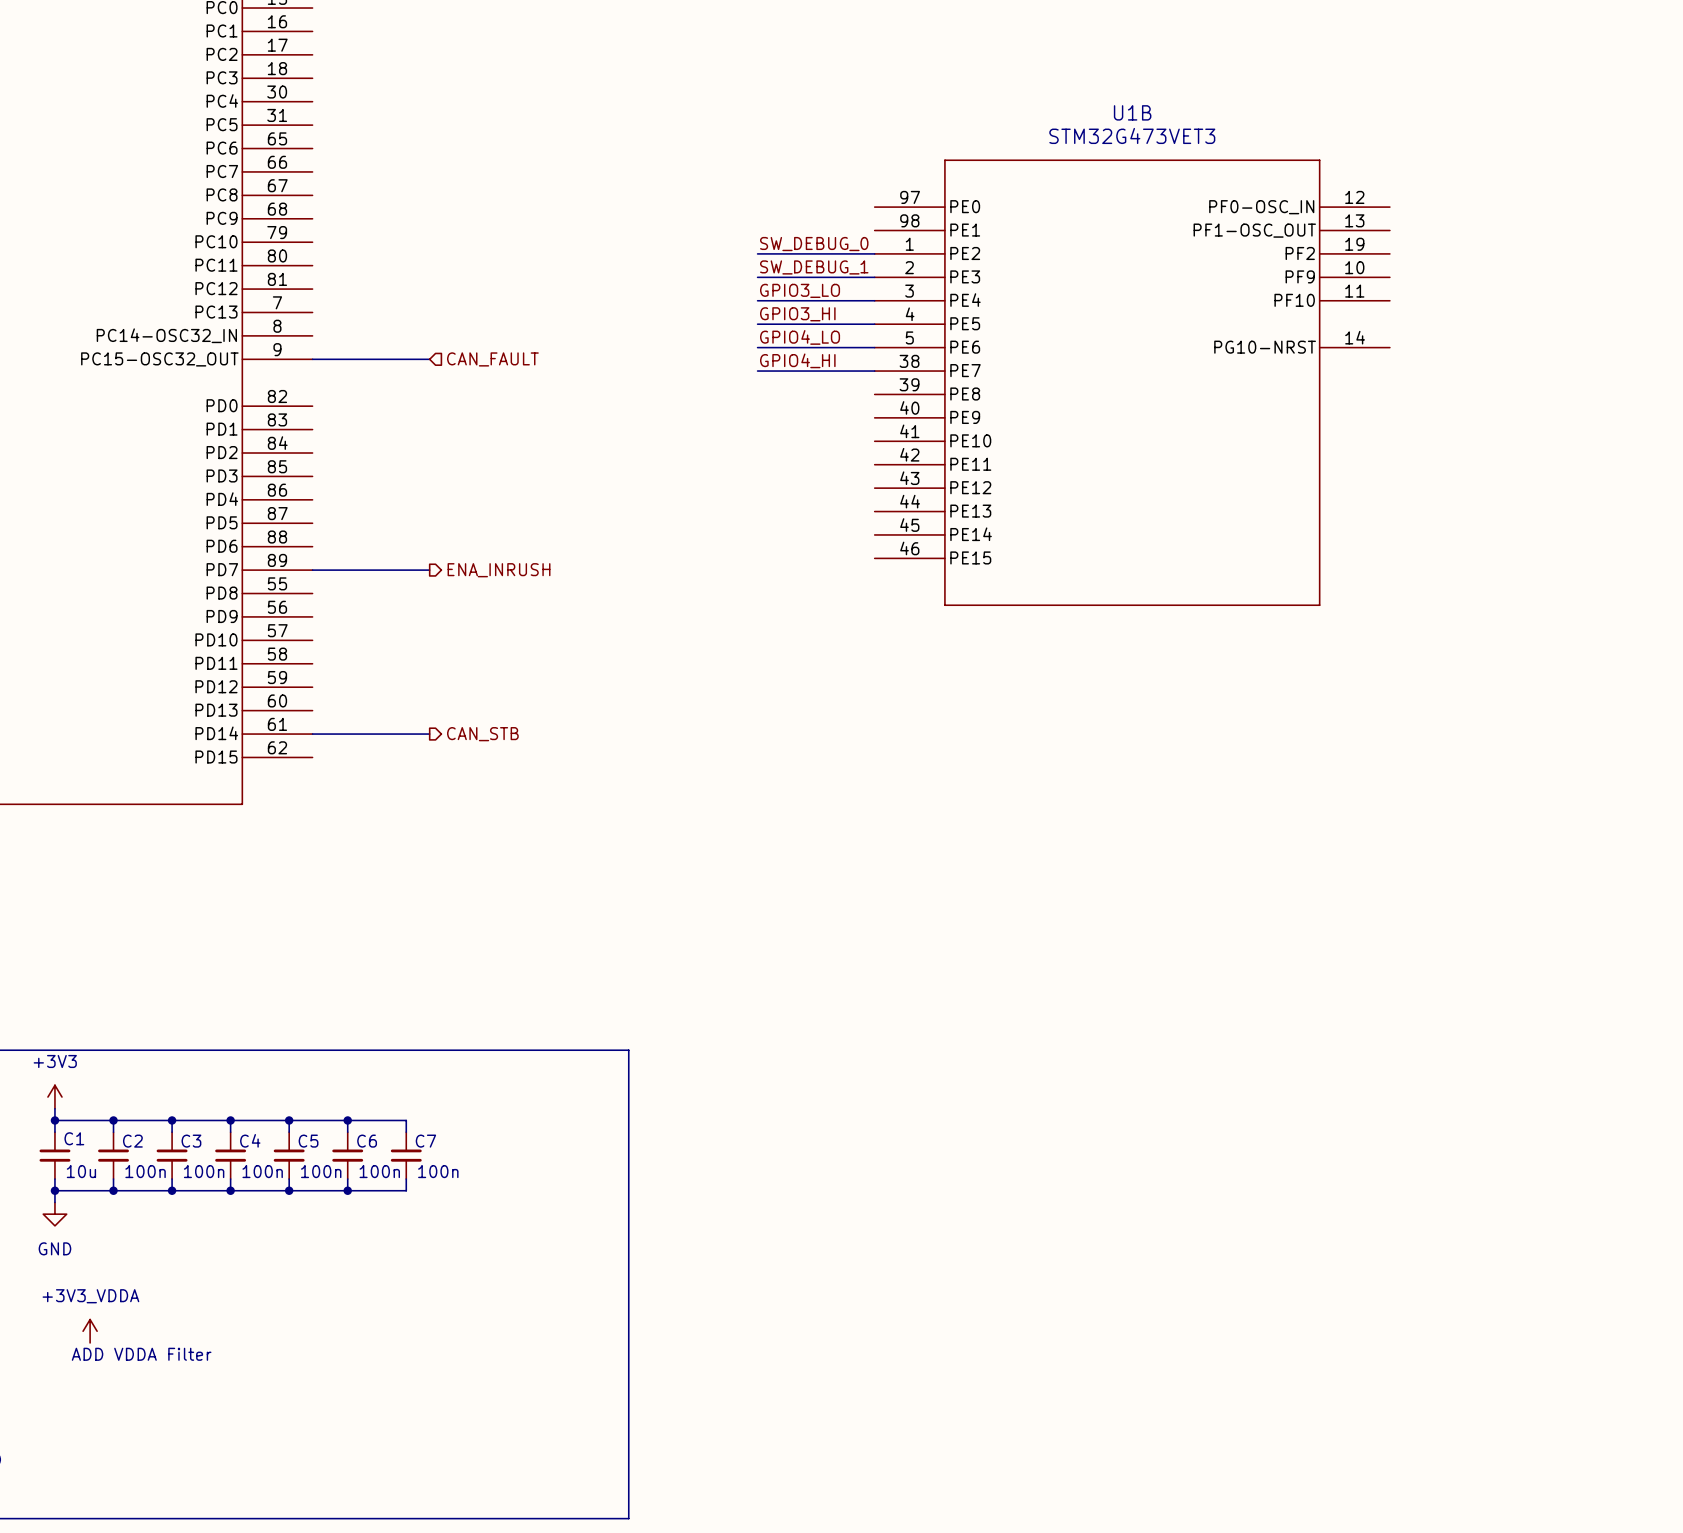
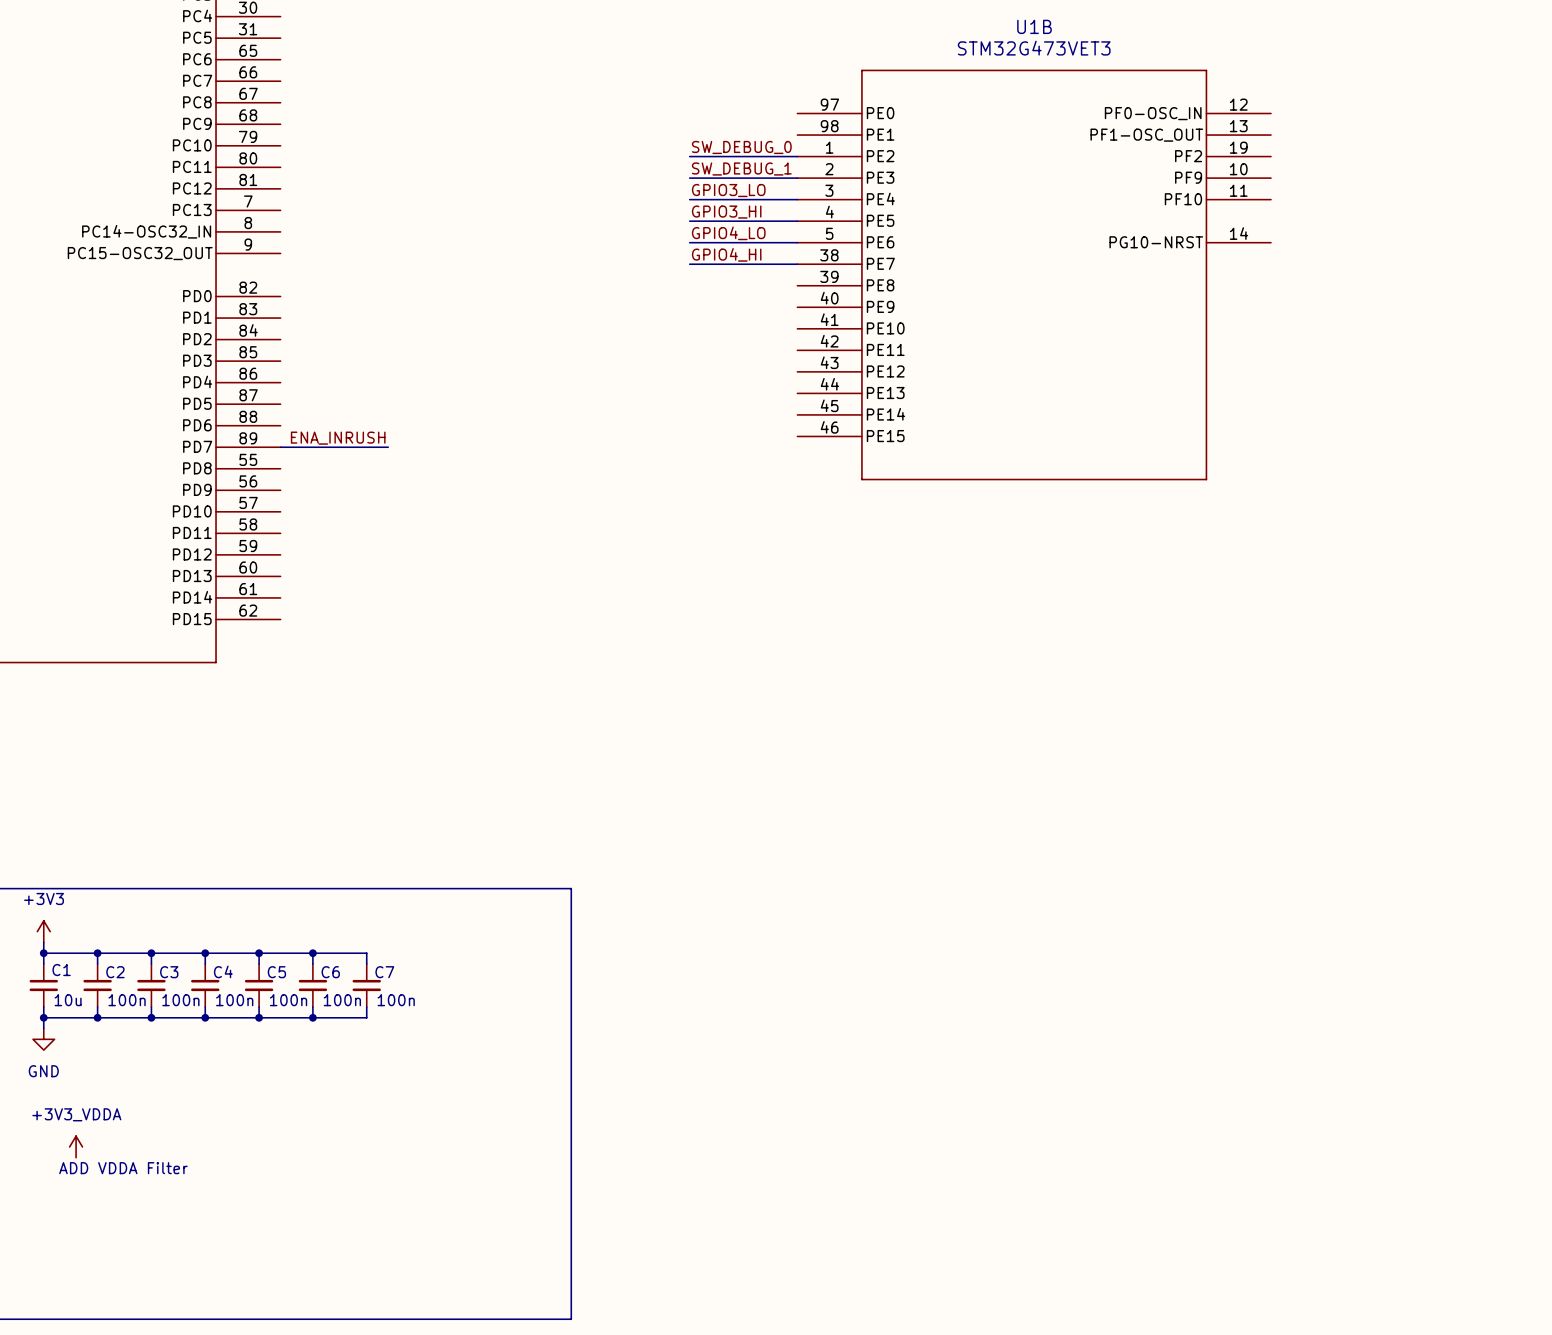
wire: (312, 359) (429, 359) -> none
hierarchical label: CAN_FAULT (492, 359) -> none
label: none -> ENA_INRUSH (338, 438)
hierarchical label: ENA_INRUSH (499, 570) -> none
wire: (312, 734) (429, 734) -> none
hierarchical label: CAN_STB (482, 734) -> none

